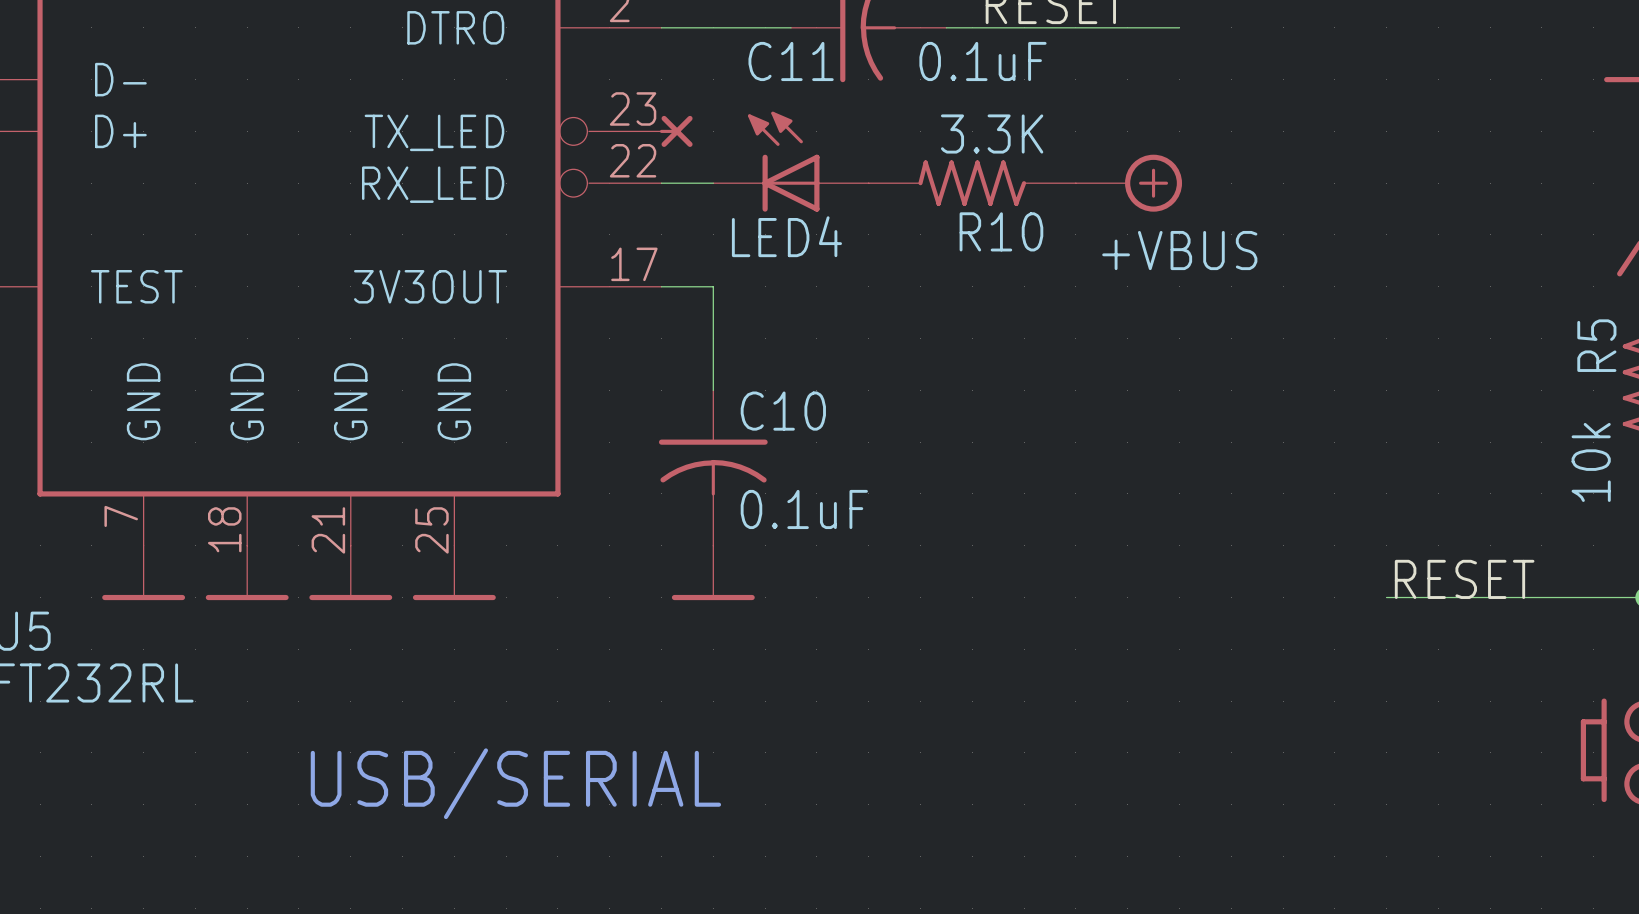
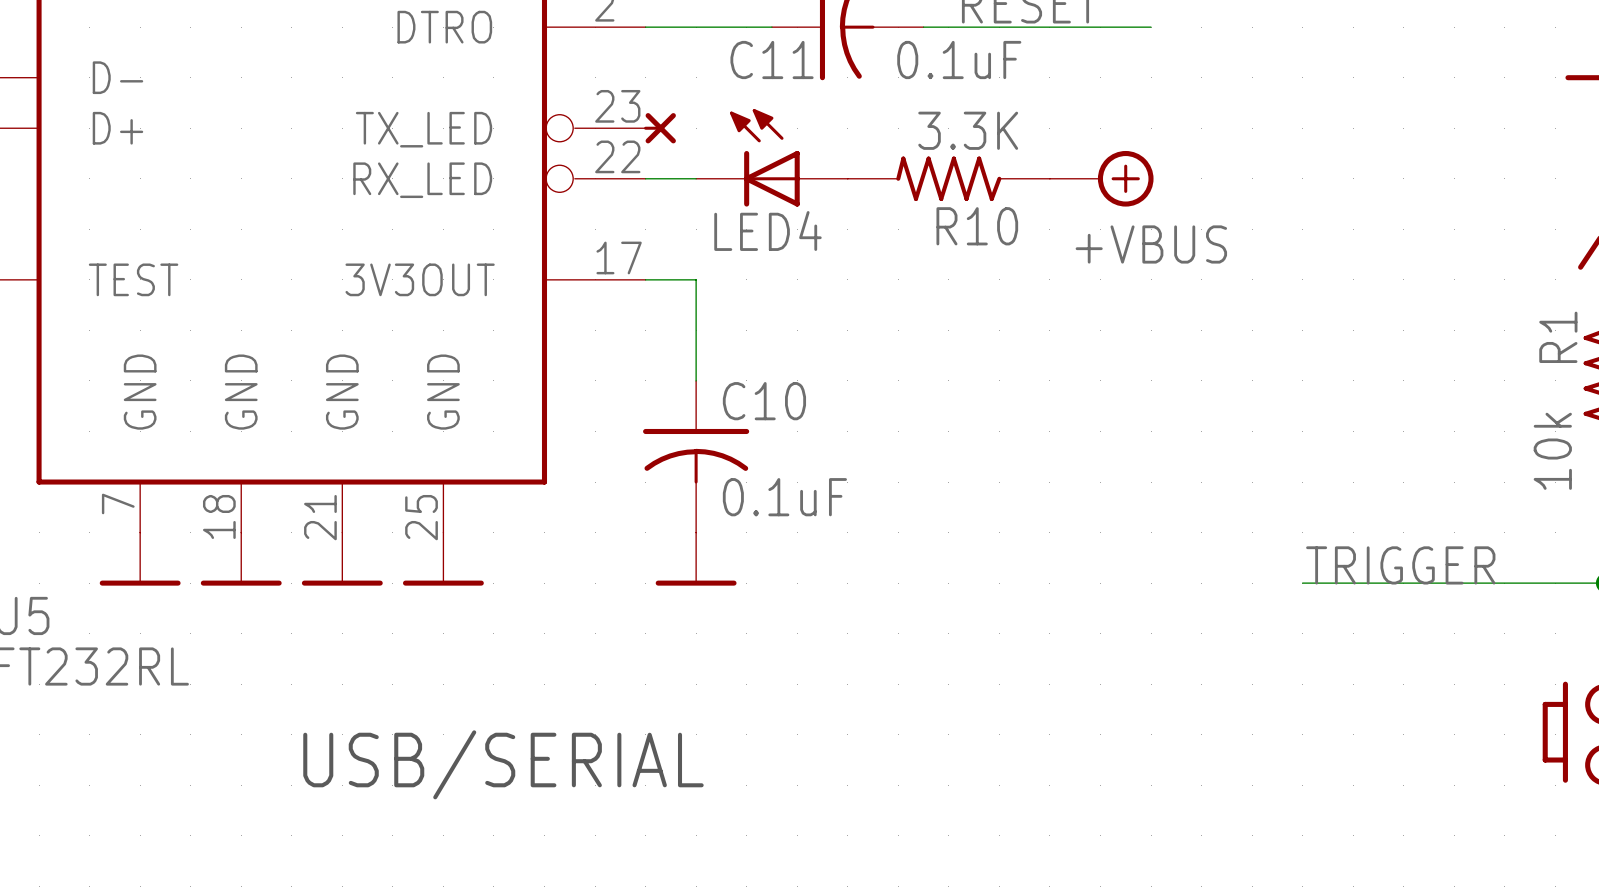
R5 name: R5 (1596, 345) -> R1 (1558, 337)
label: none -> TRIGGER (1400, 565)
label: RESET (1464, 579) -> none
wire: none -> (1302, 583) (1353, 583)

